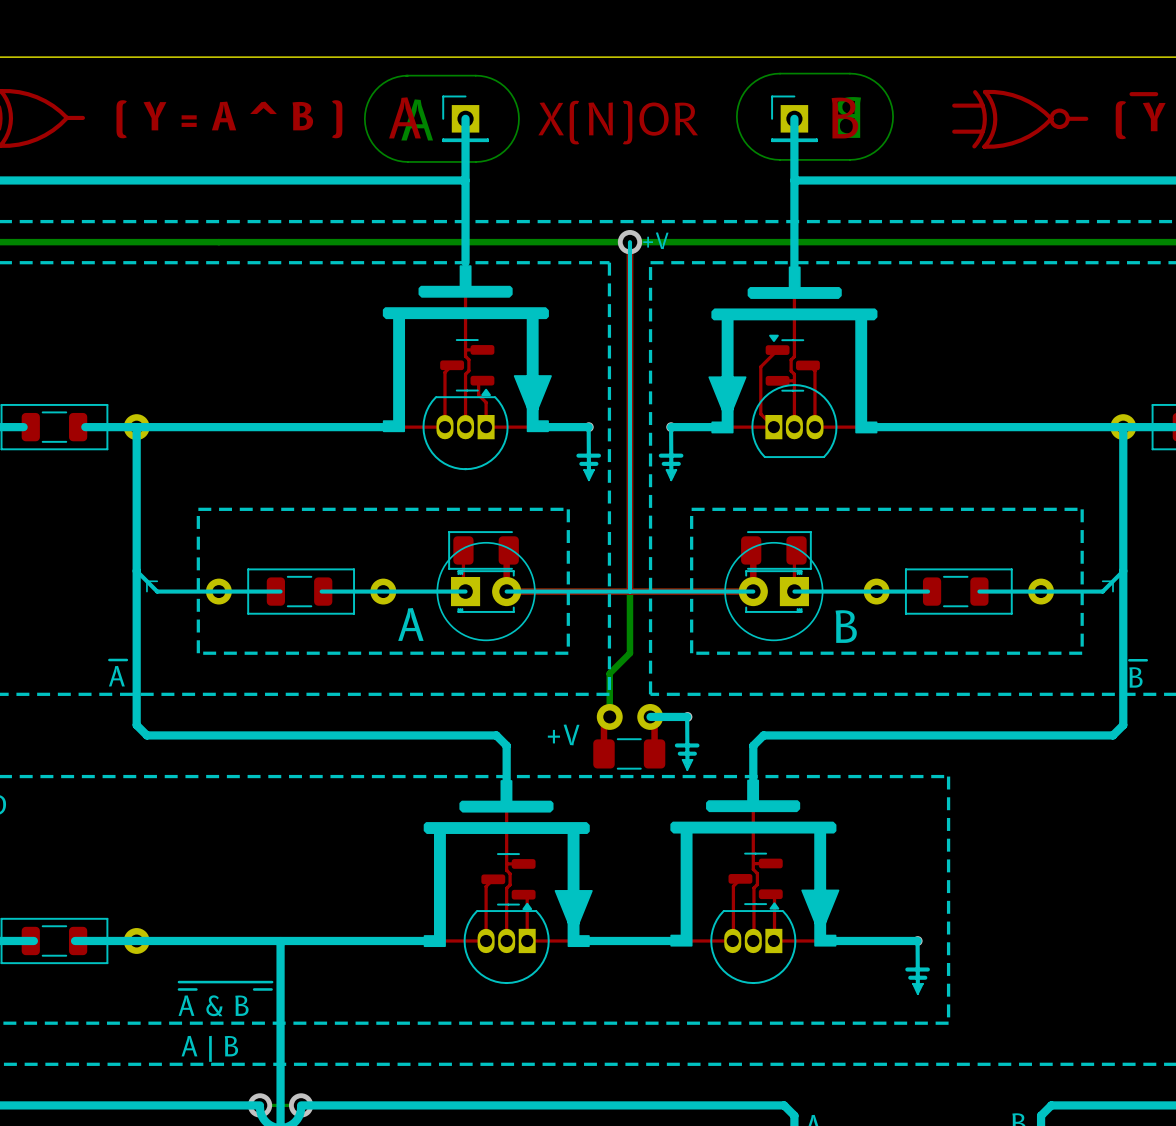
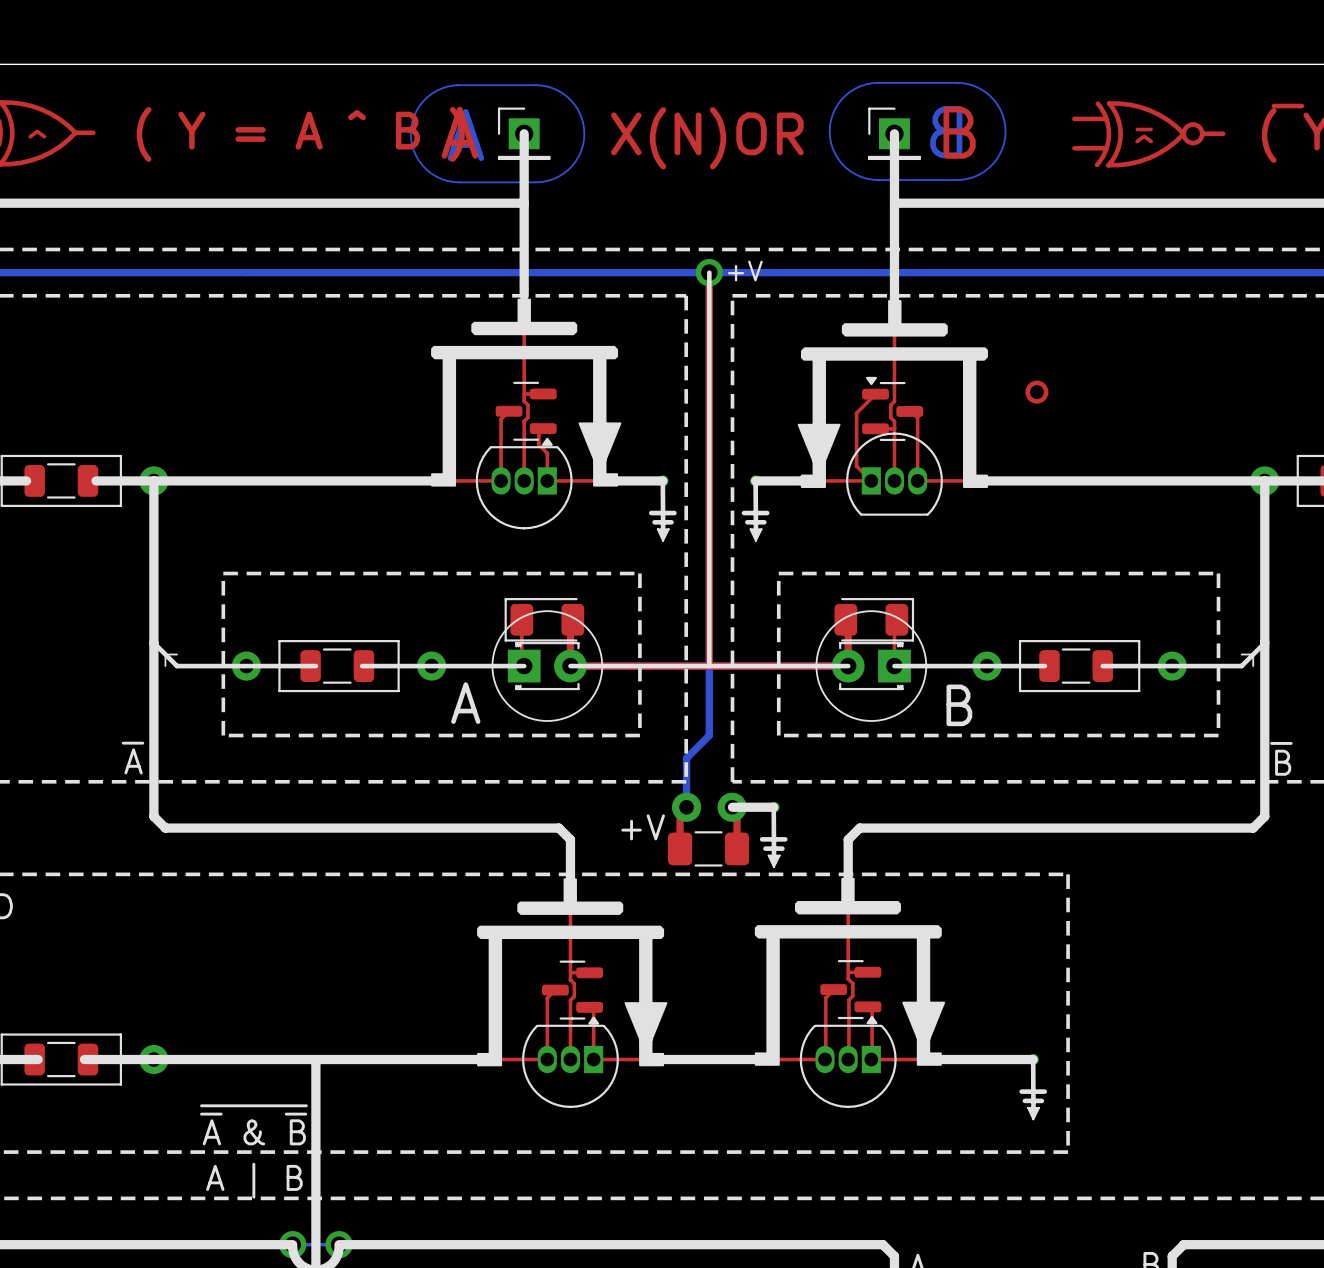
text: none -> ^ (37, 134)
text: none -> ~{^} (1144, 135)
drawing: none -> [1025, 380, 1049, 404]

